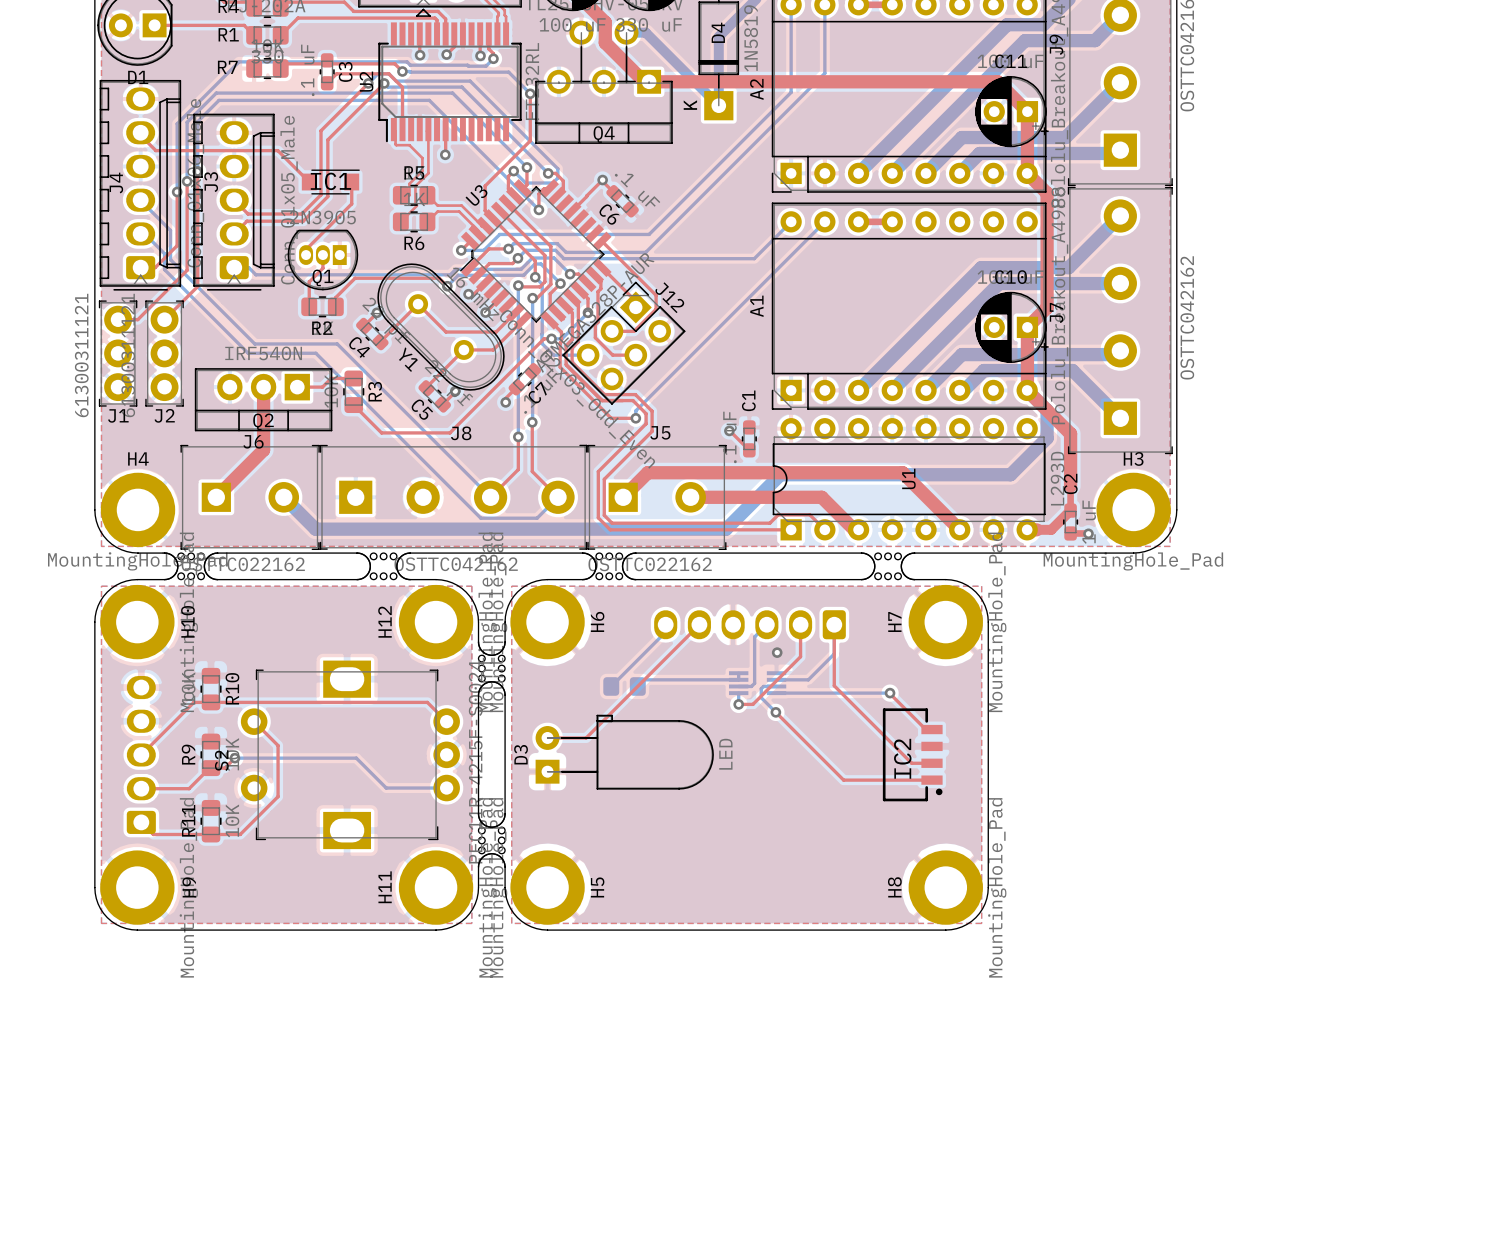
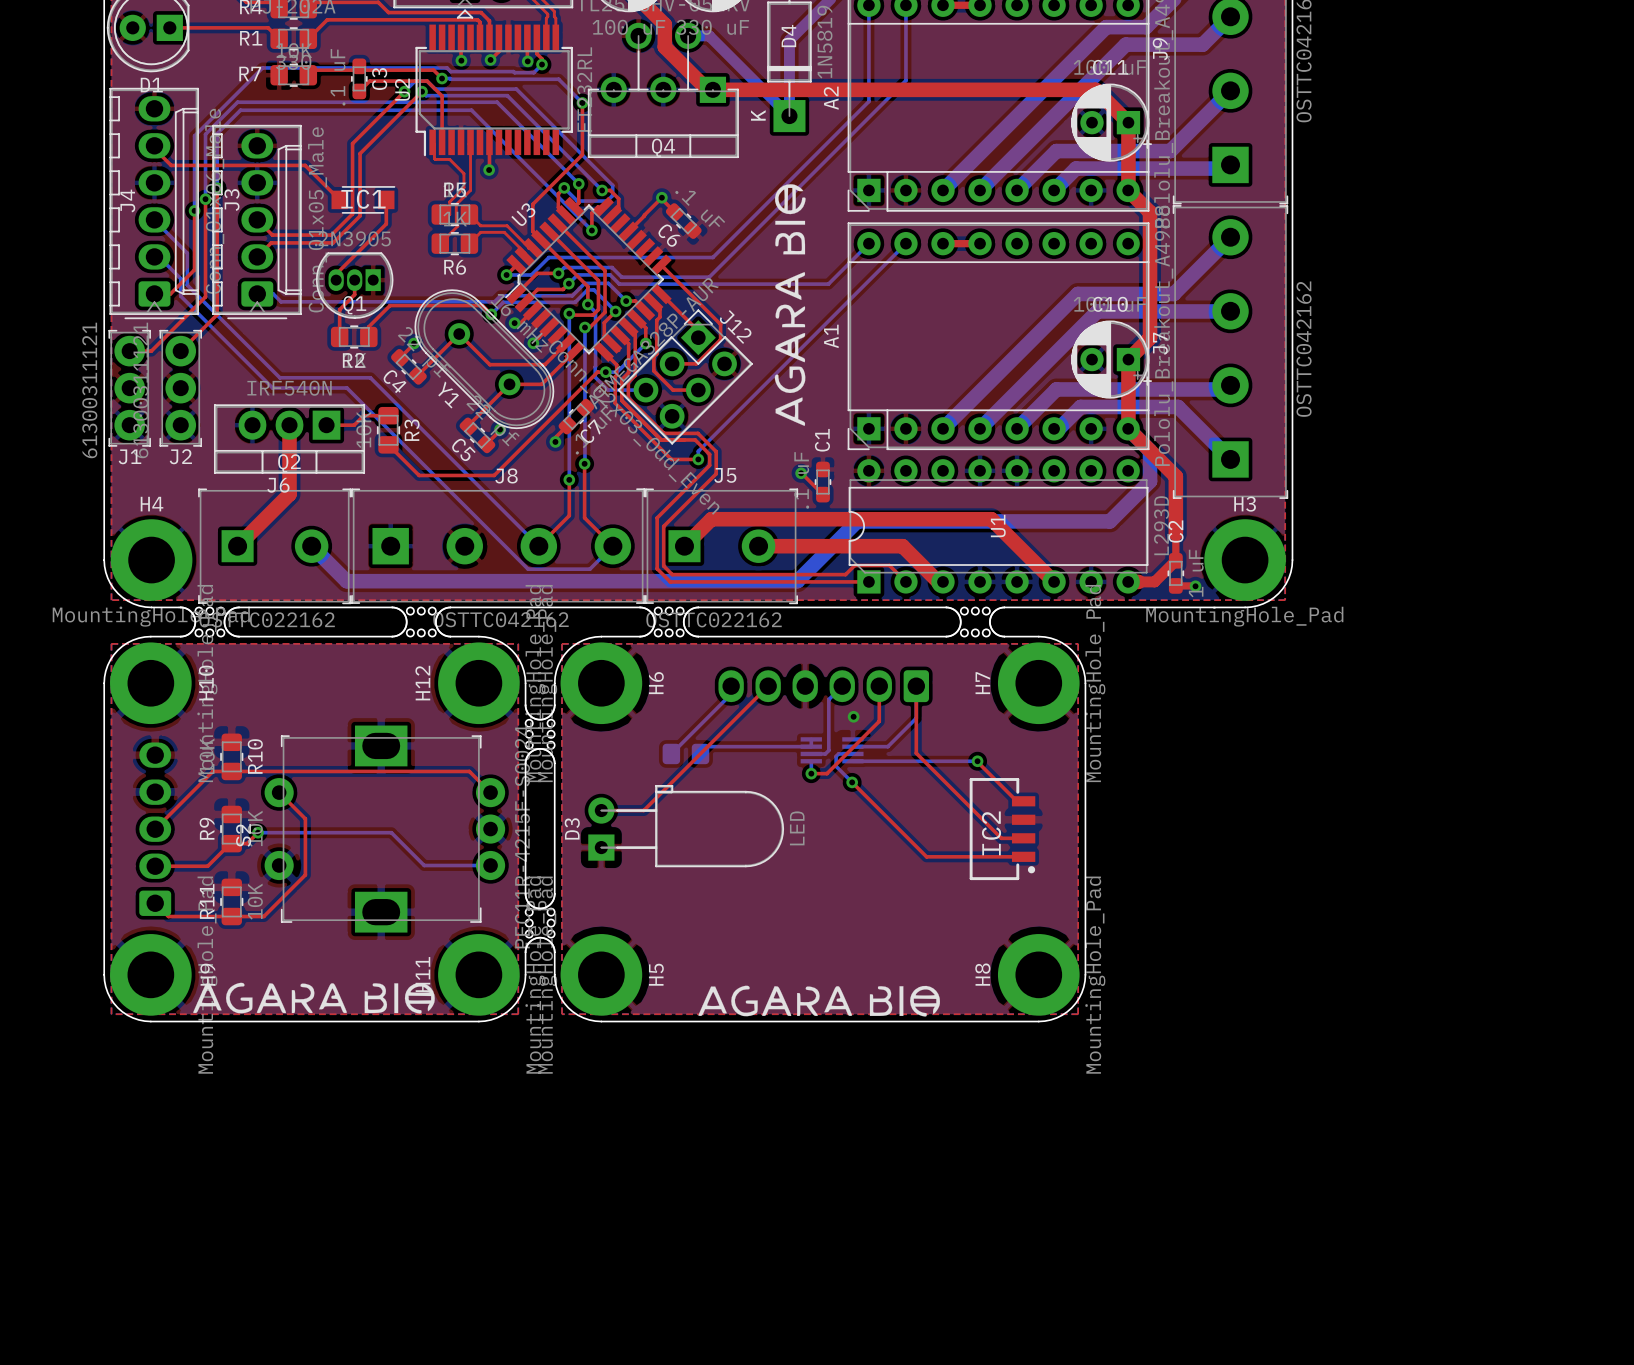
drawing: none -> [774, 184, 806, 426]
drawing: none -> [193, 982, 435, 1014]
drawing: none -> [698, 985, 941, 1017]

